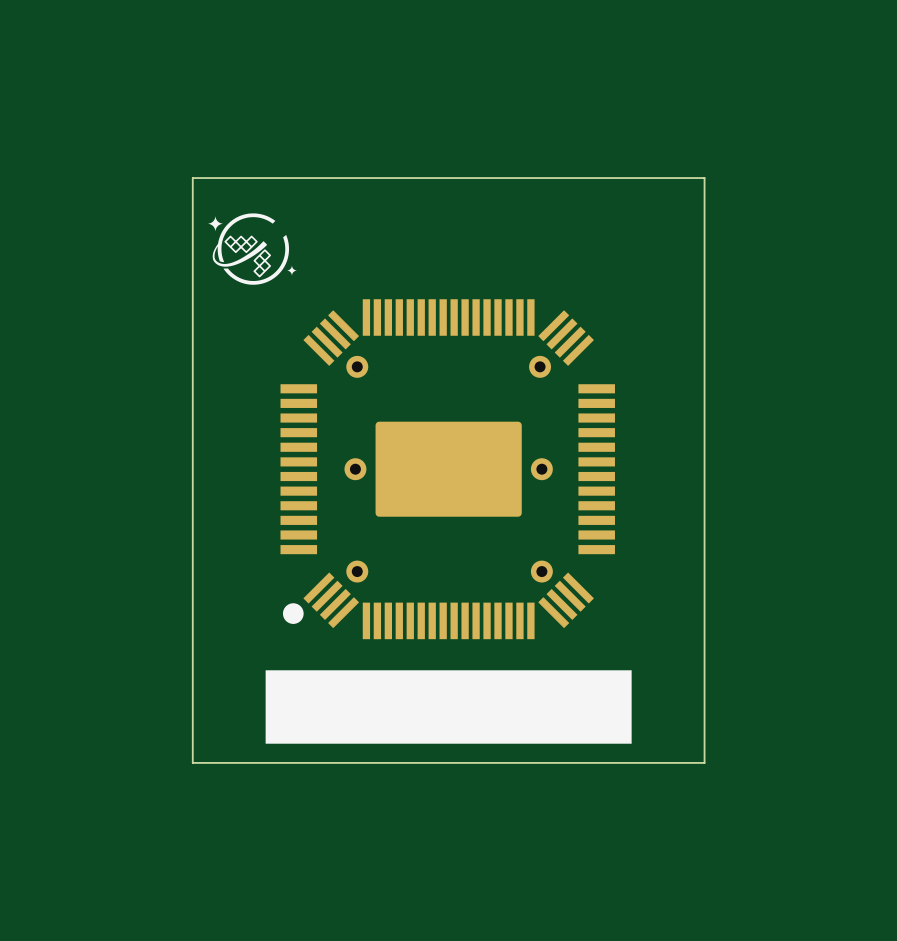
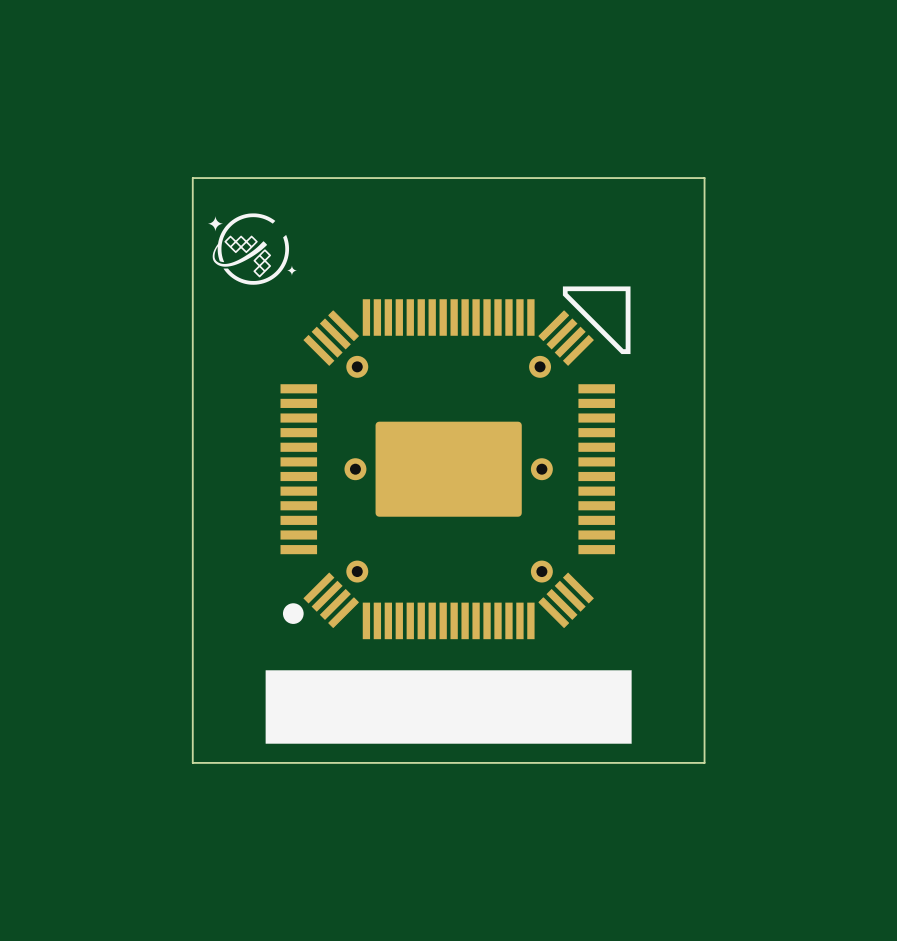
drawing: none -> [562, 286, 631, 355]

